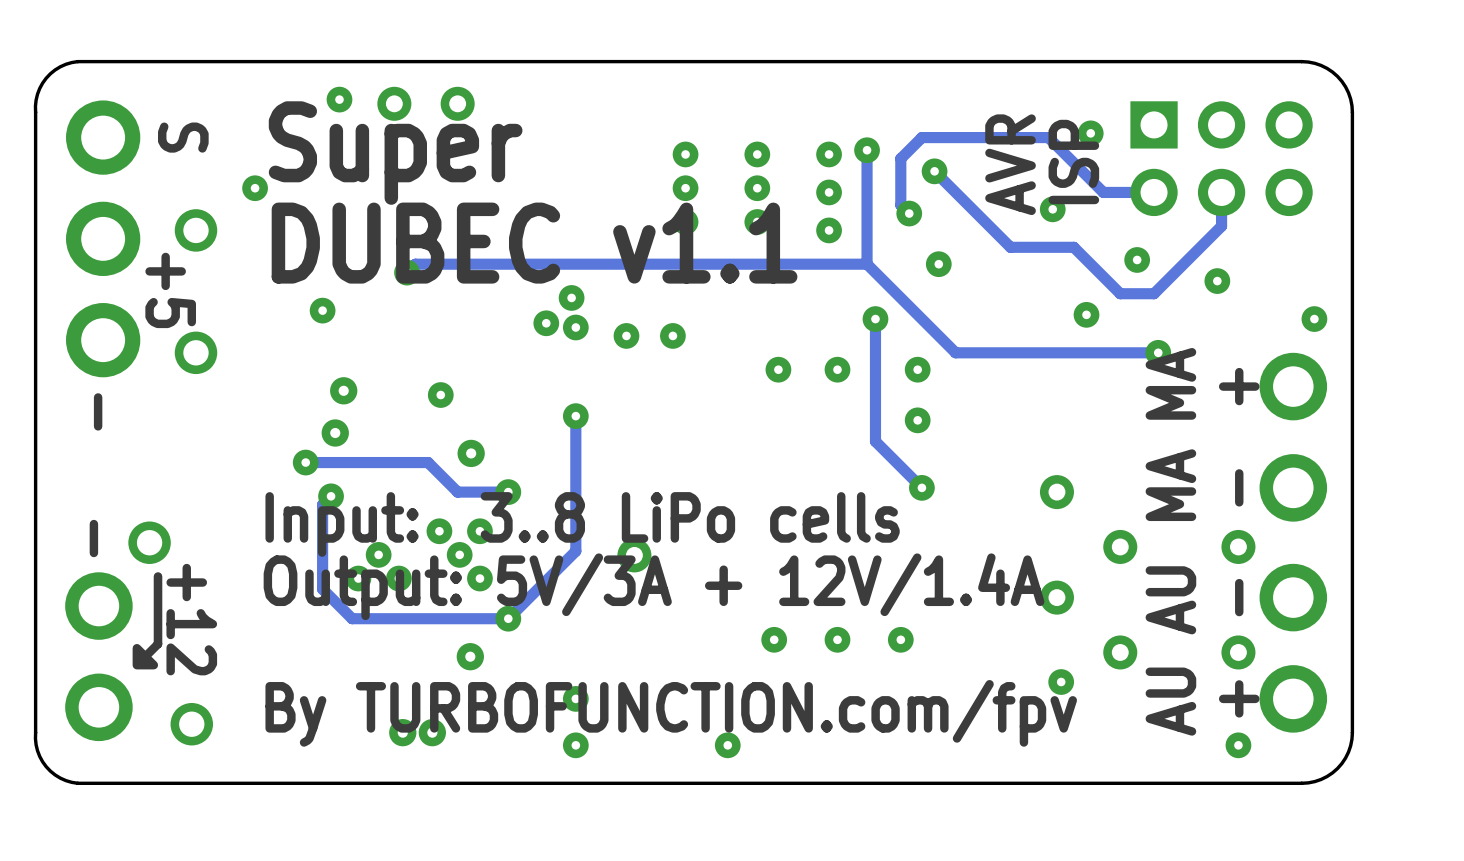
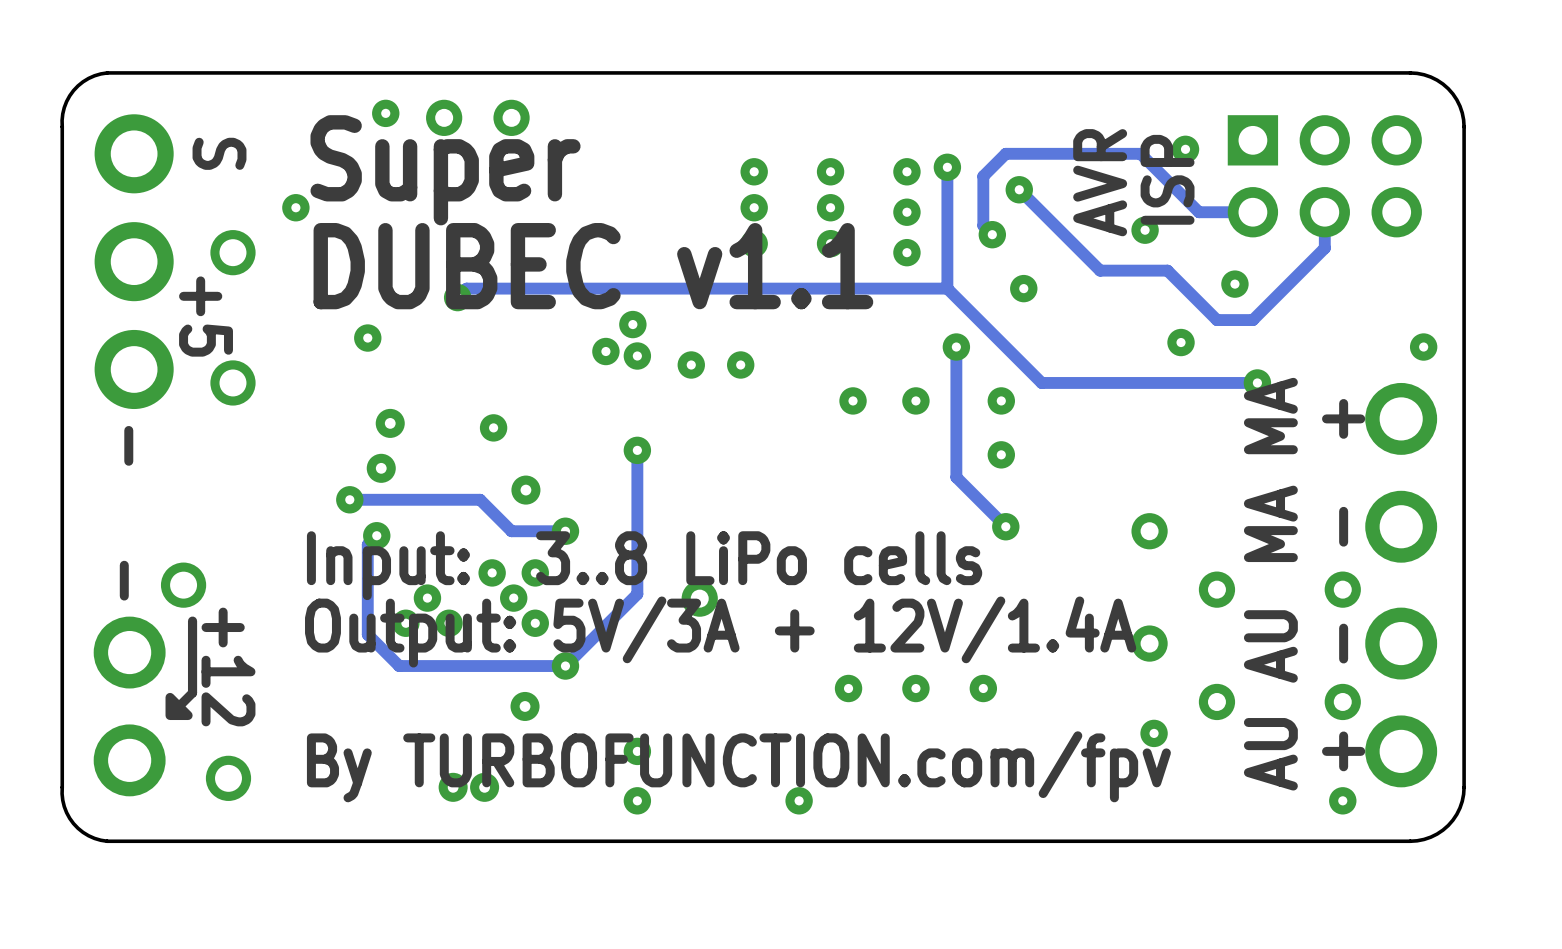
via: (1217, 281) -> none

